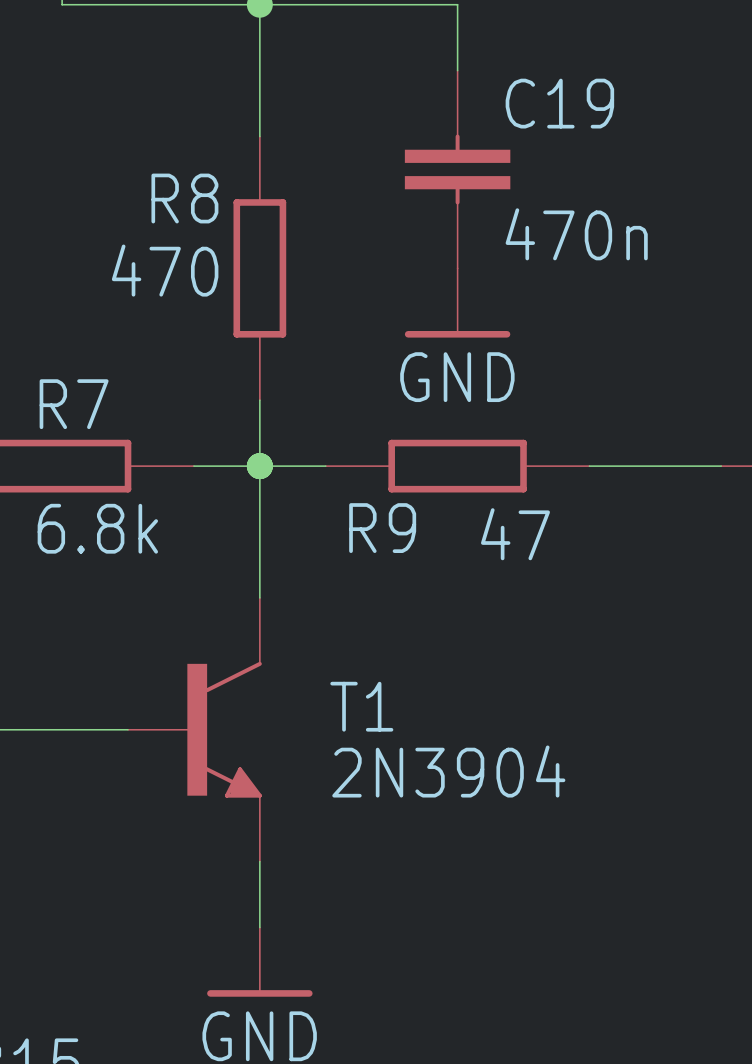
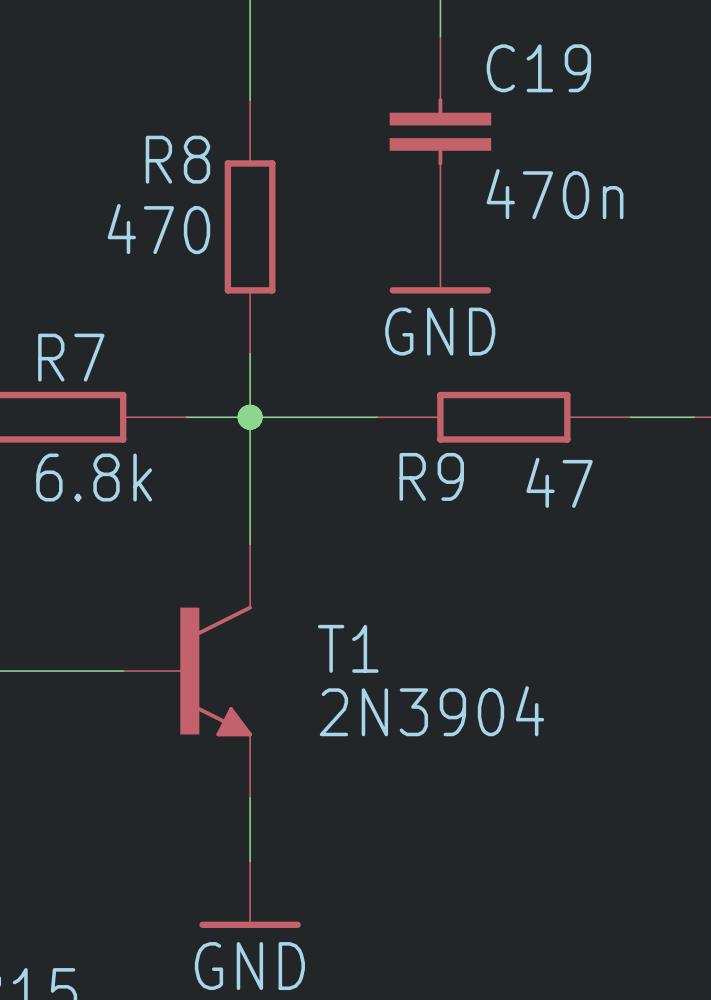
R9 position: (457, 466) -> (503, 417)

